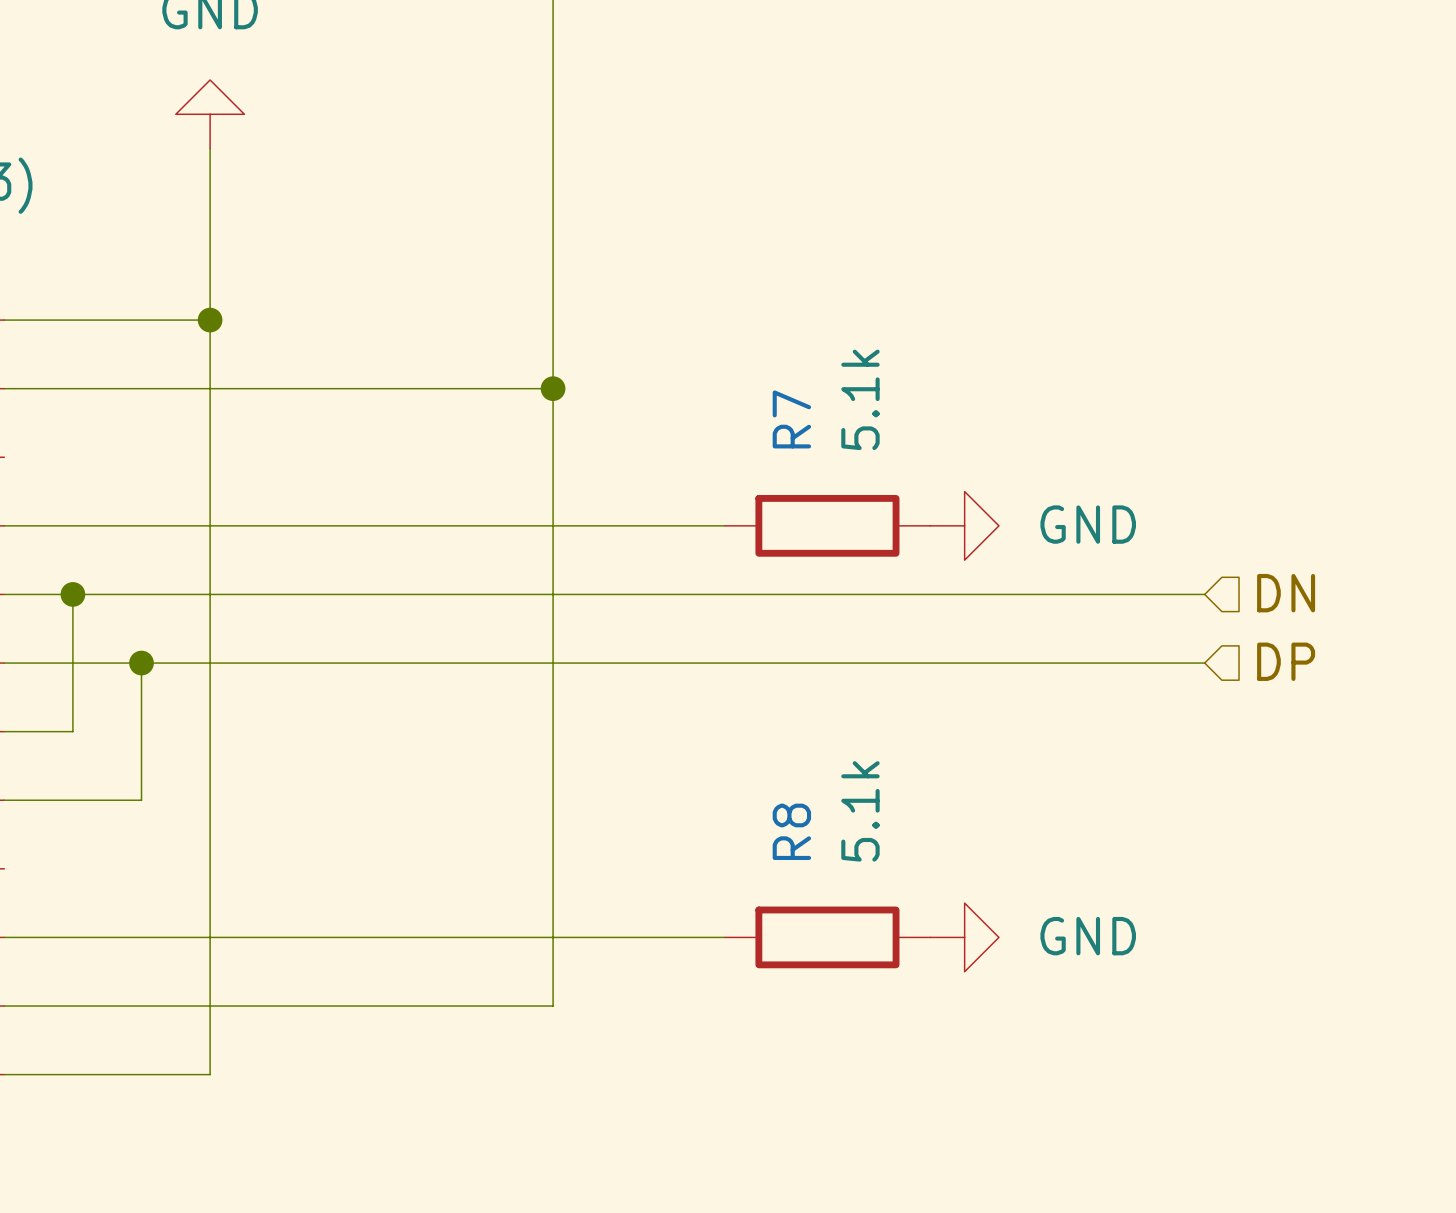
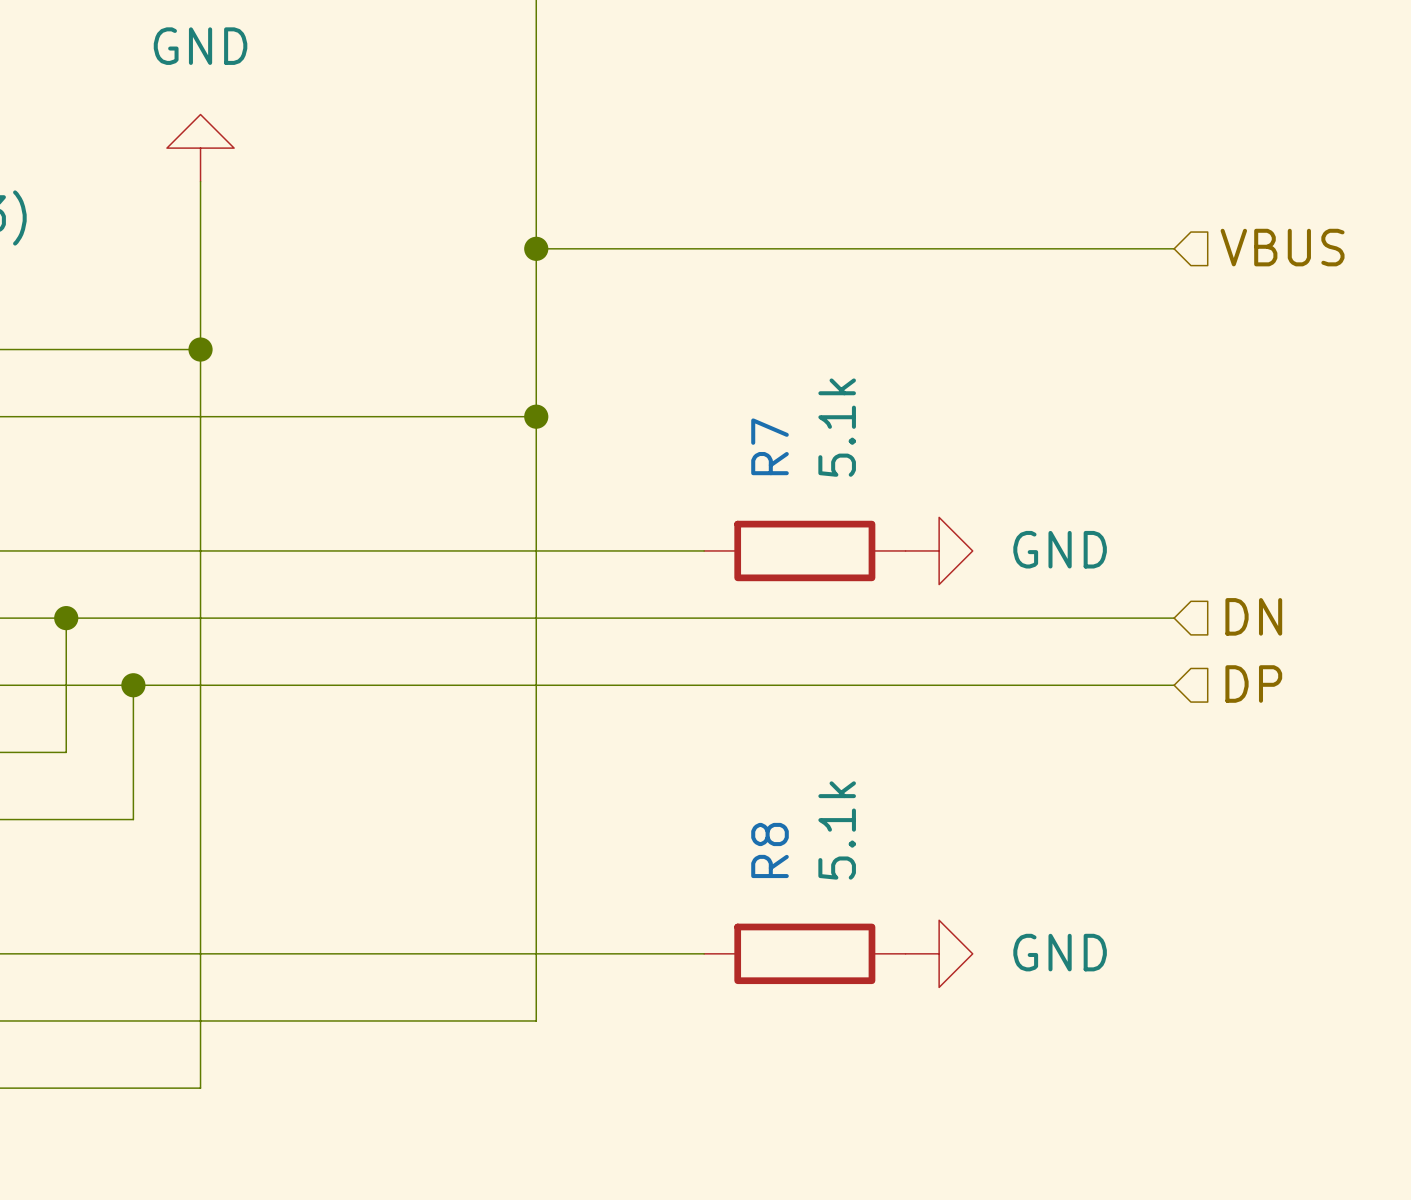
hierarchical label: none -> VBUS (1282, 247)
wire: none -> (536, 248) (1174, 248)
junction: none -> (536, 248)

